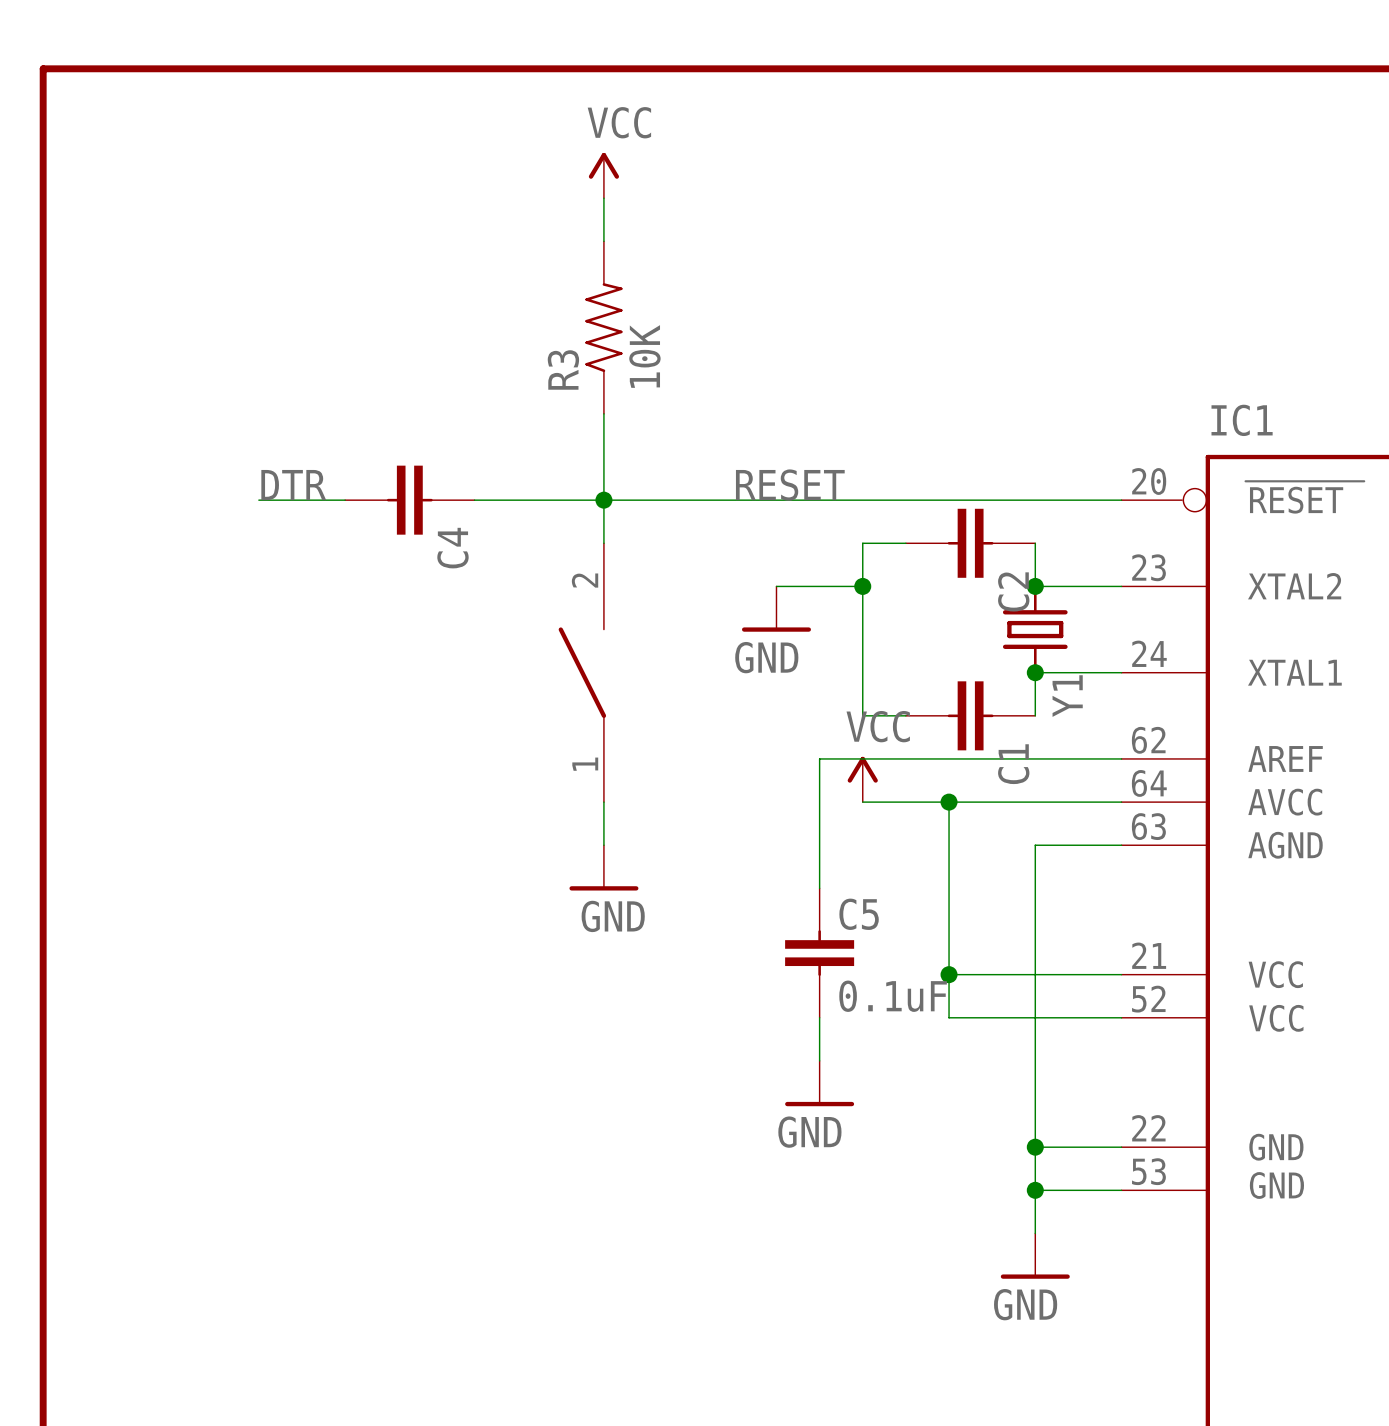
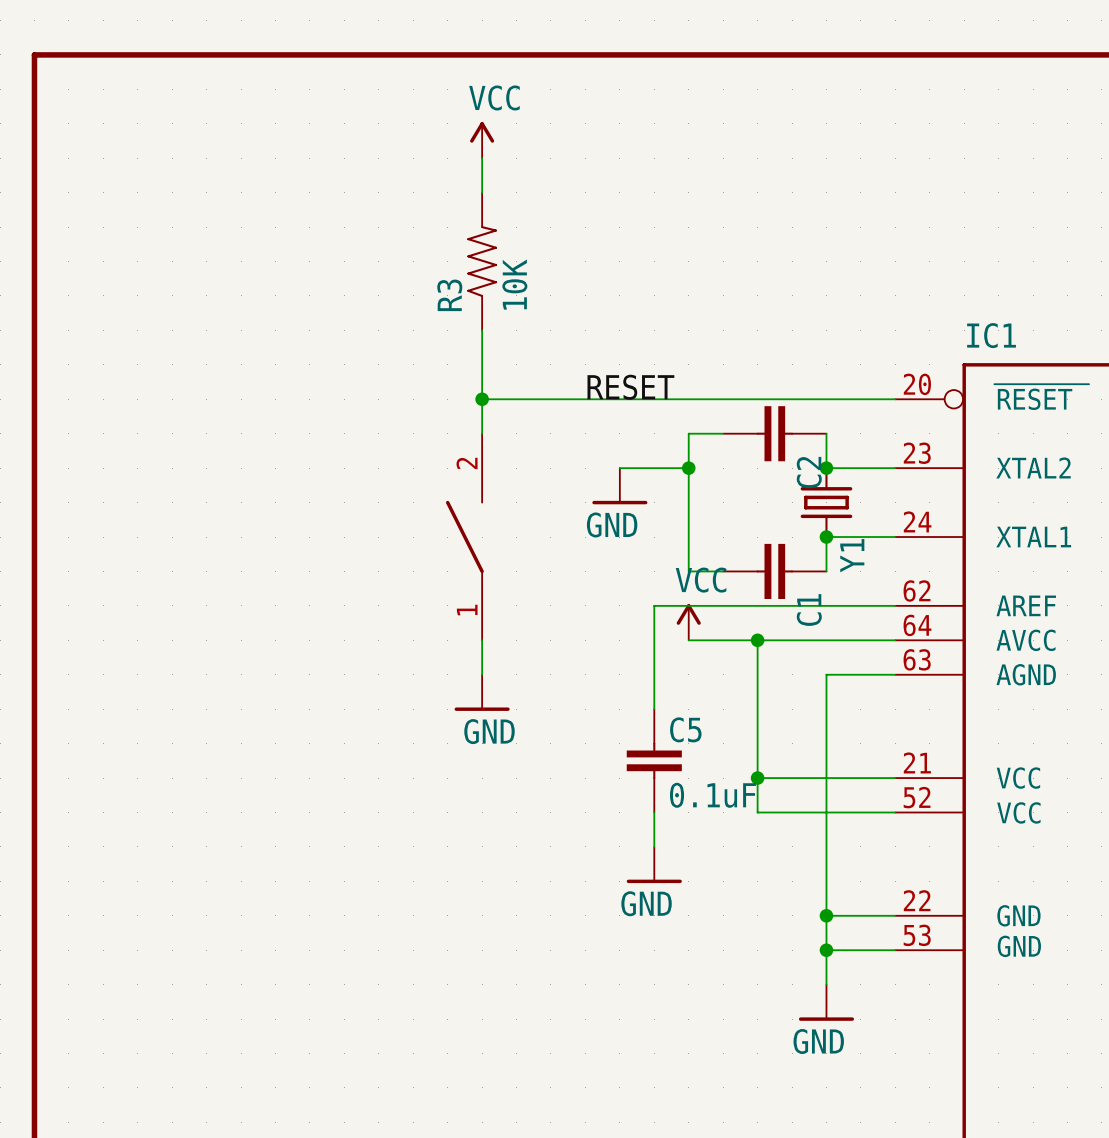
label: DTR (293, 485) -> none
wire: (258, 500) (345, 500) -> none
C4: (409, 500) -> none
wire: (474, 500) (603, 500) -> none

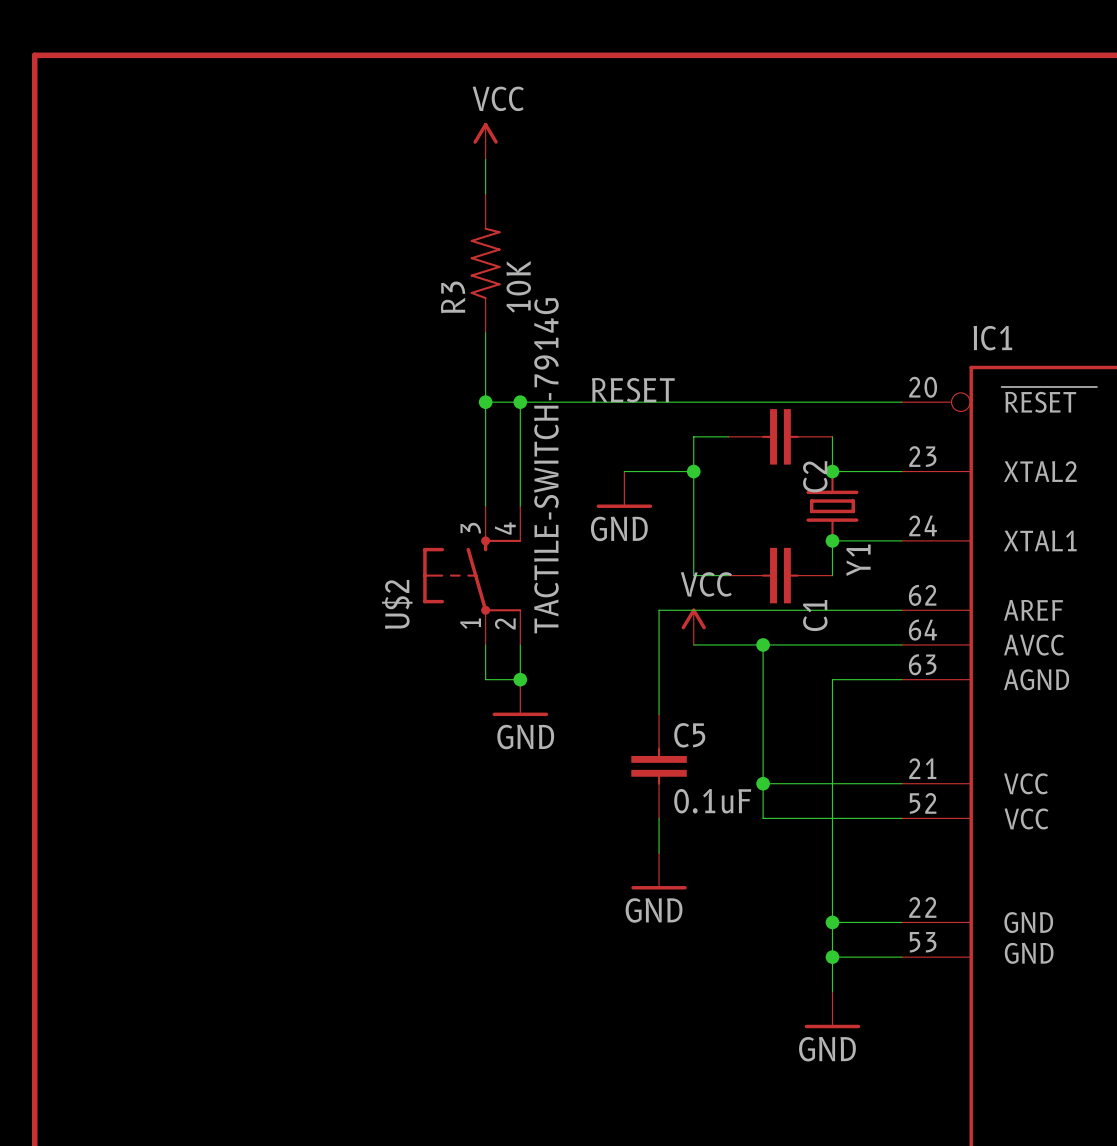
wire: none -> (520, 402) (520, 506)
junction: none -> (520, 402)
part: (464, 537) -> none
U$2: none -> TACTILE-SWITCH-7914G (472, 575)
wire: none -> (520, 644) (520, 679) (485, 679)
junction: none -> (520, 679)
power symbol position: GND (482, 692) -> GND (520, 697)

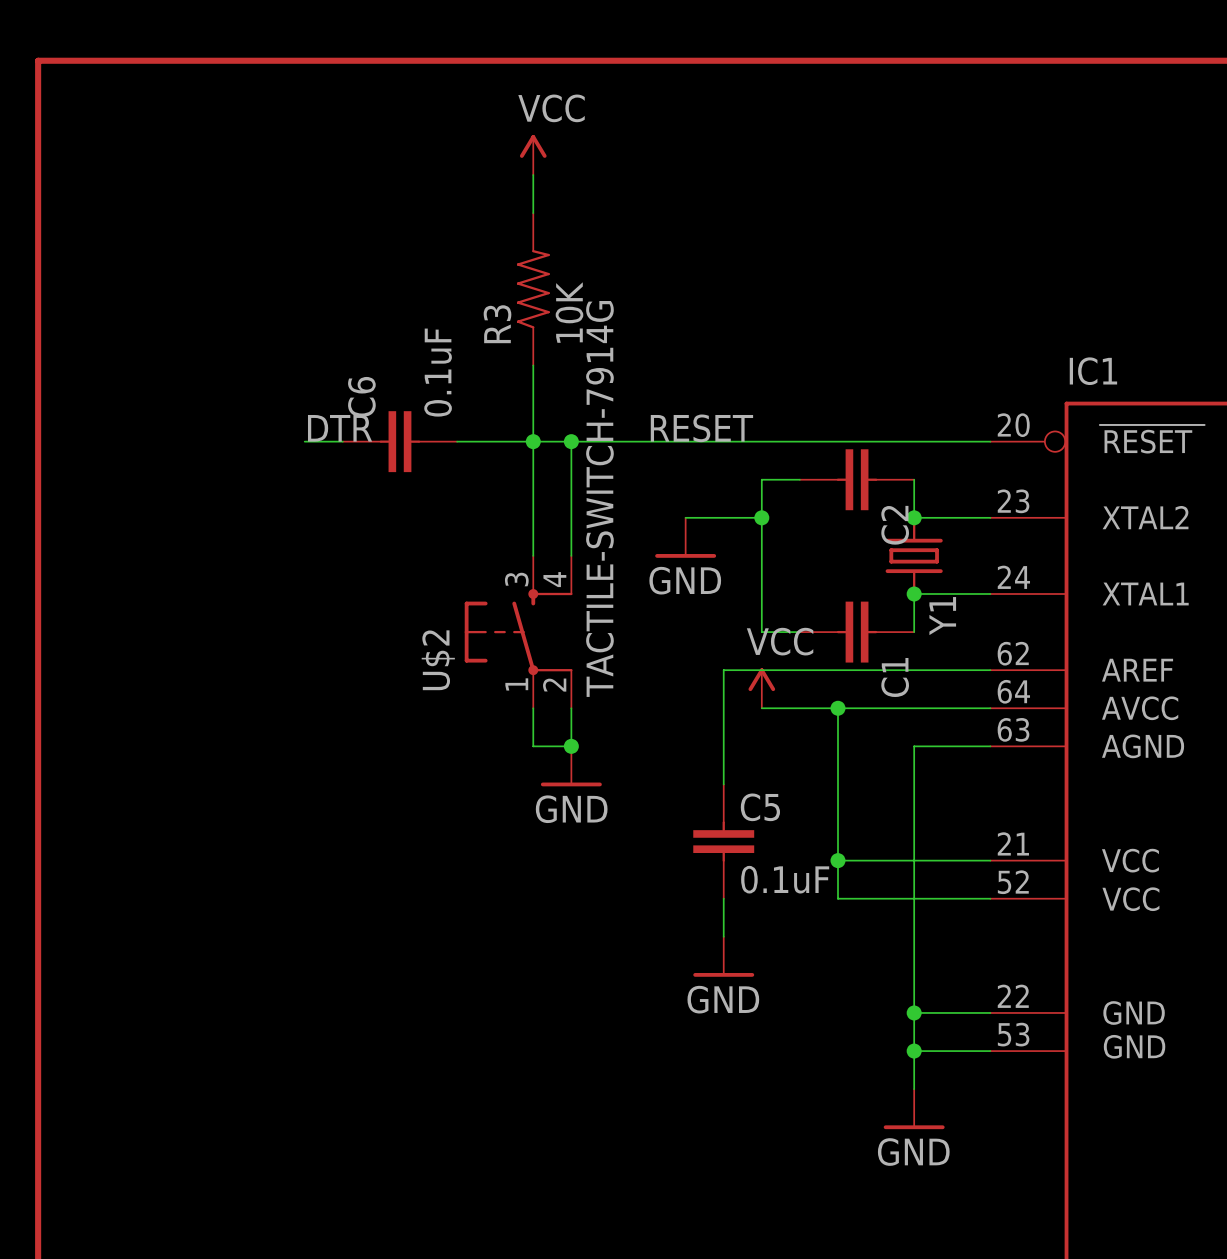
label: none -> DTR (340, 428)
wire: none -> (304, 441) (342, 441)
C6: none -> 0.1uF (399, 441)
wire: none -> (457, 441) (533, 441)

